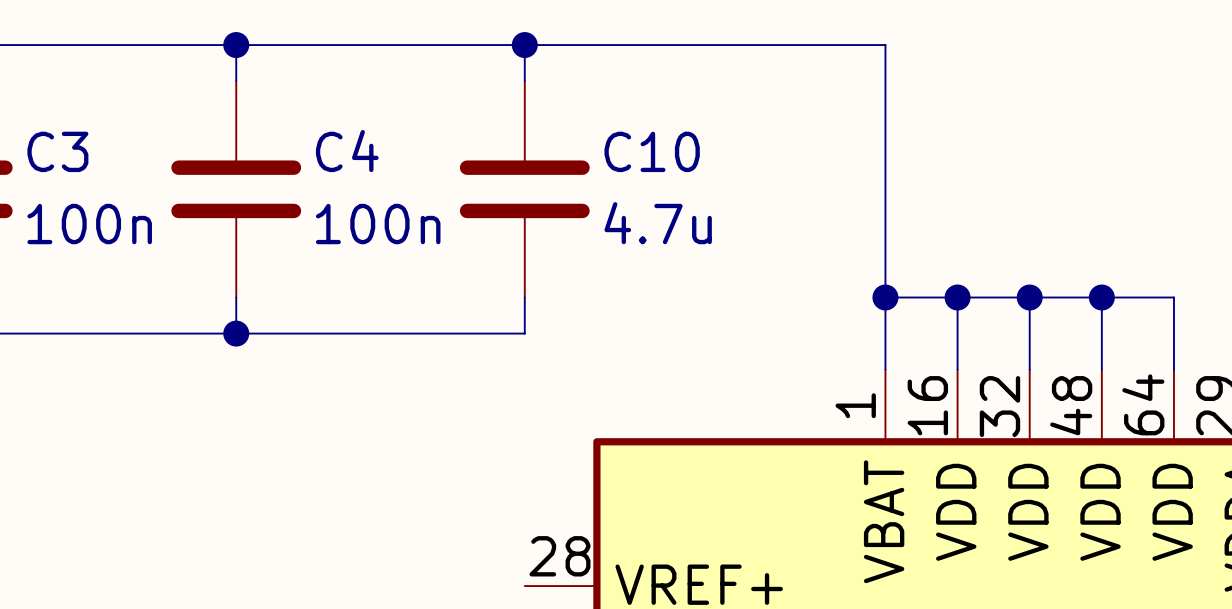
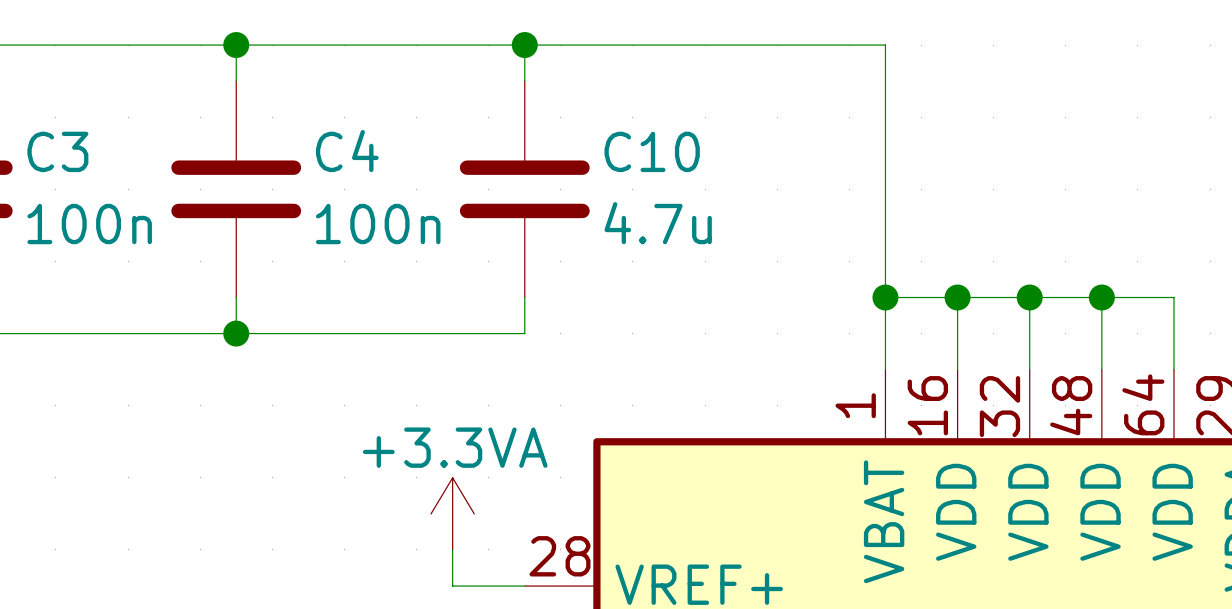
power symbol: none -> +3.3VA (452, 513)
wire: none -> (452, 549) (452, 586) (524, 586)

